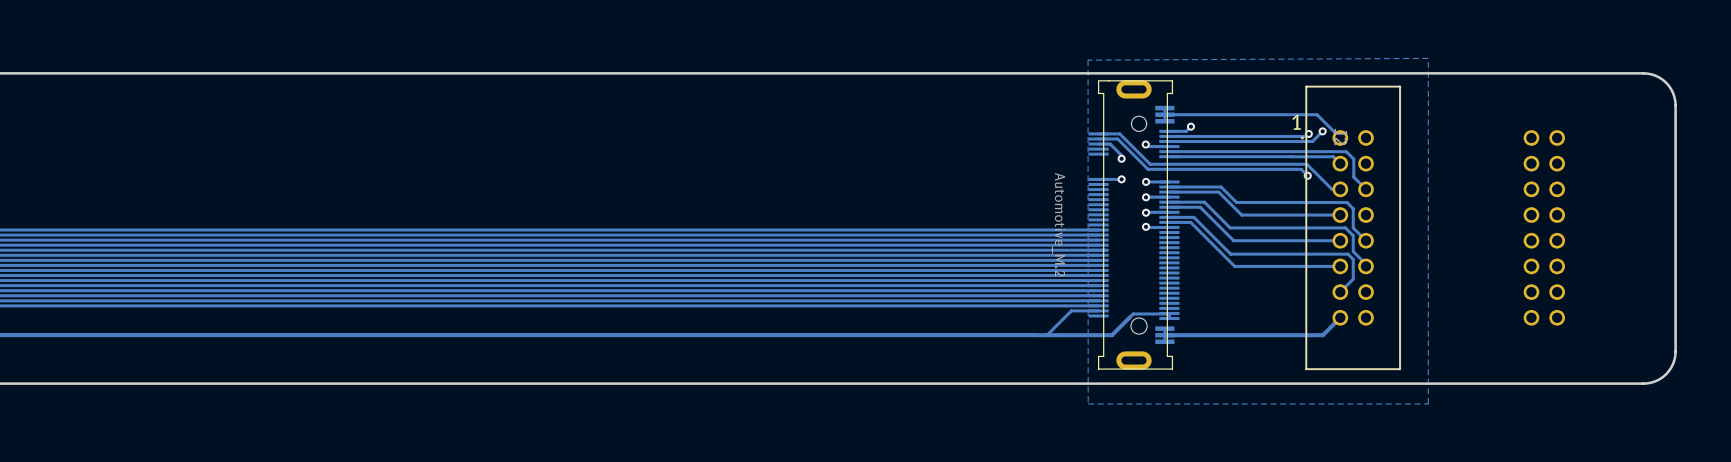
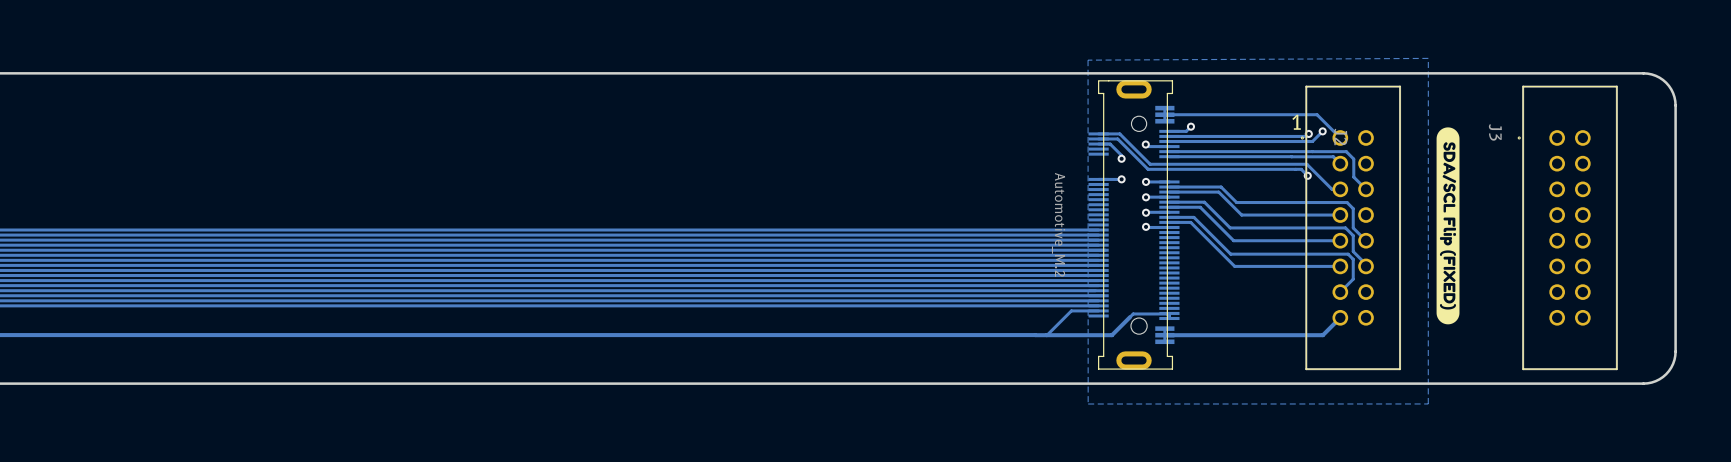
drawing: none -> [1436, 127, 1460, 325]
J3 side: top (1544, 227) -> bottom (1567, 227)

